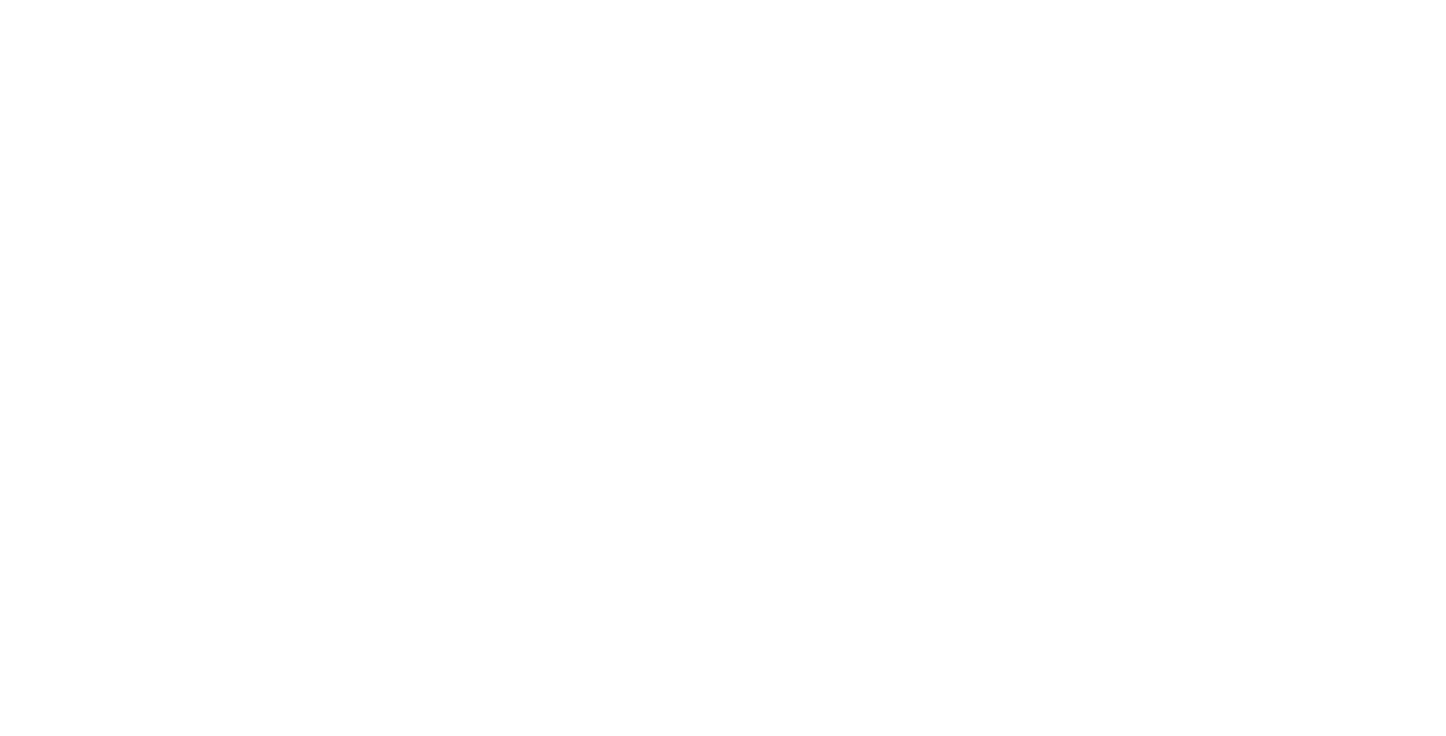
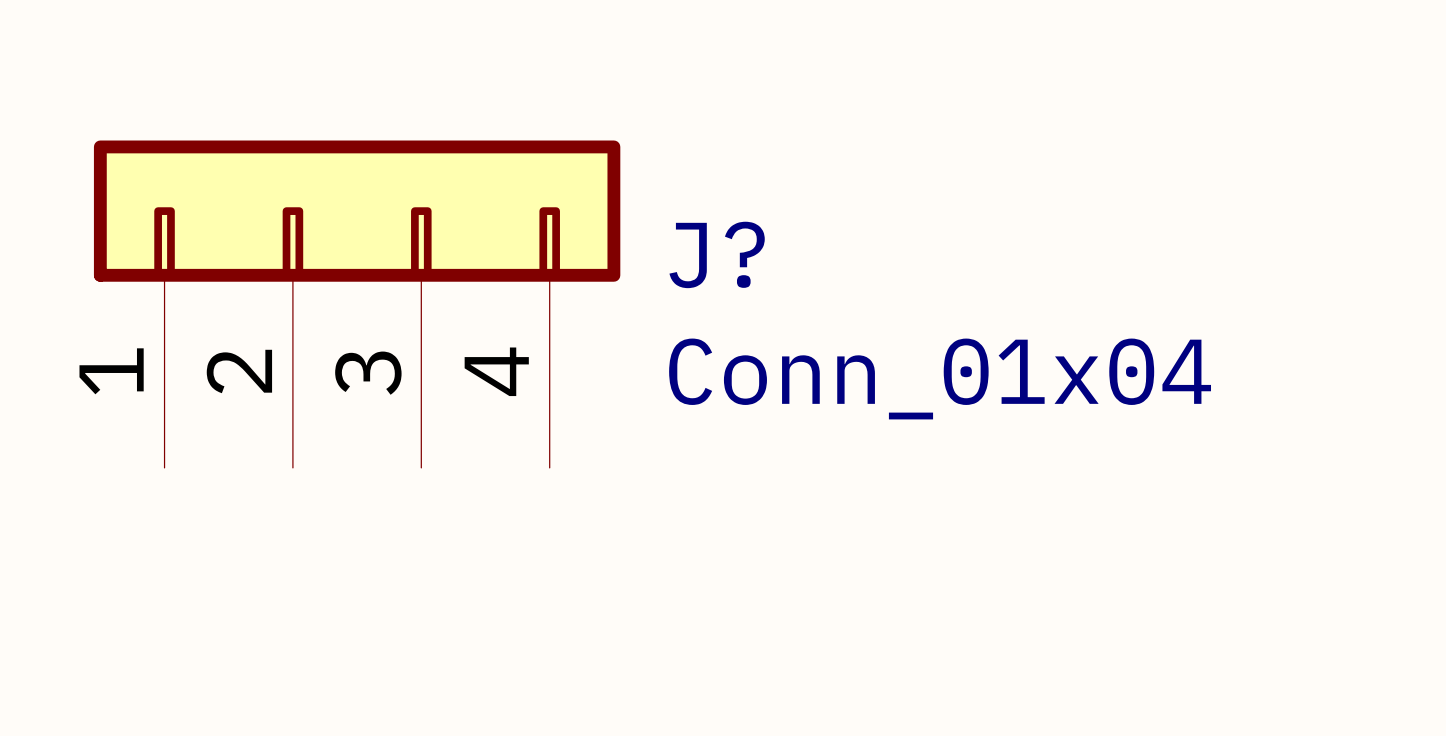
J?: none -> Conn_01x04 (357, 304)

